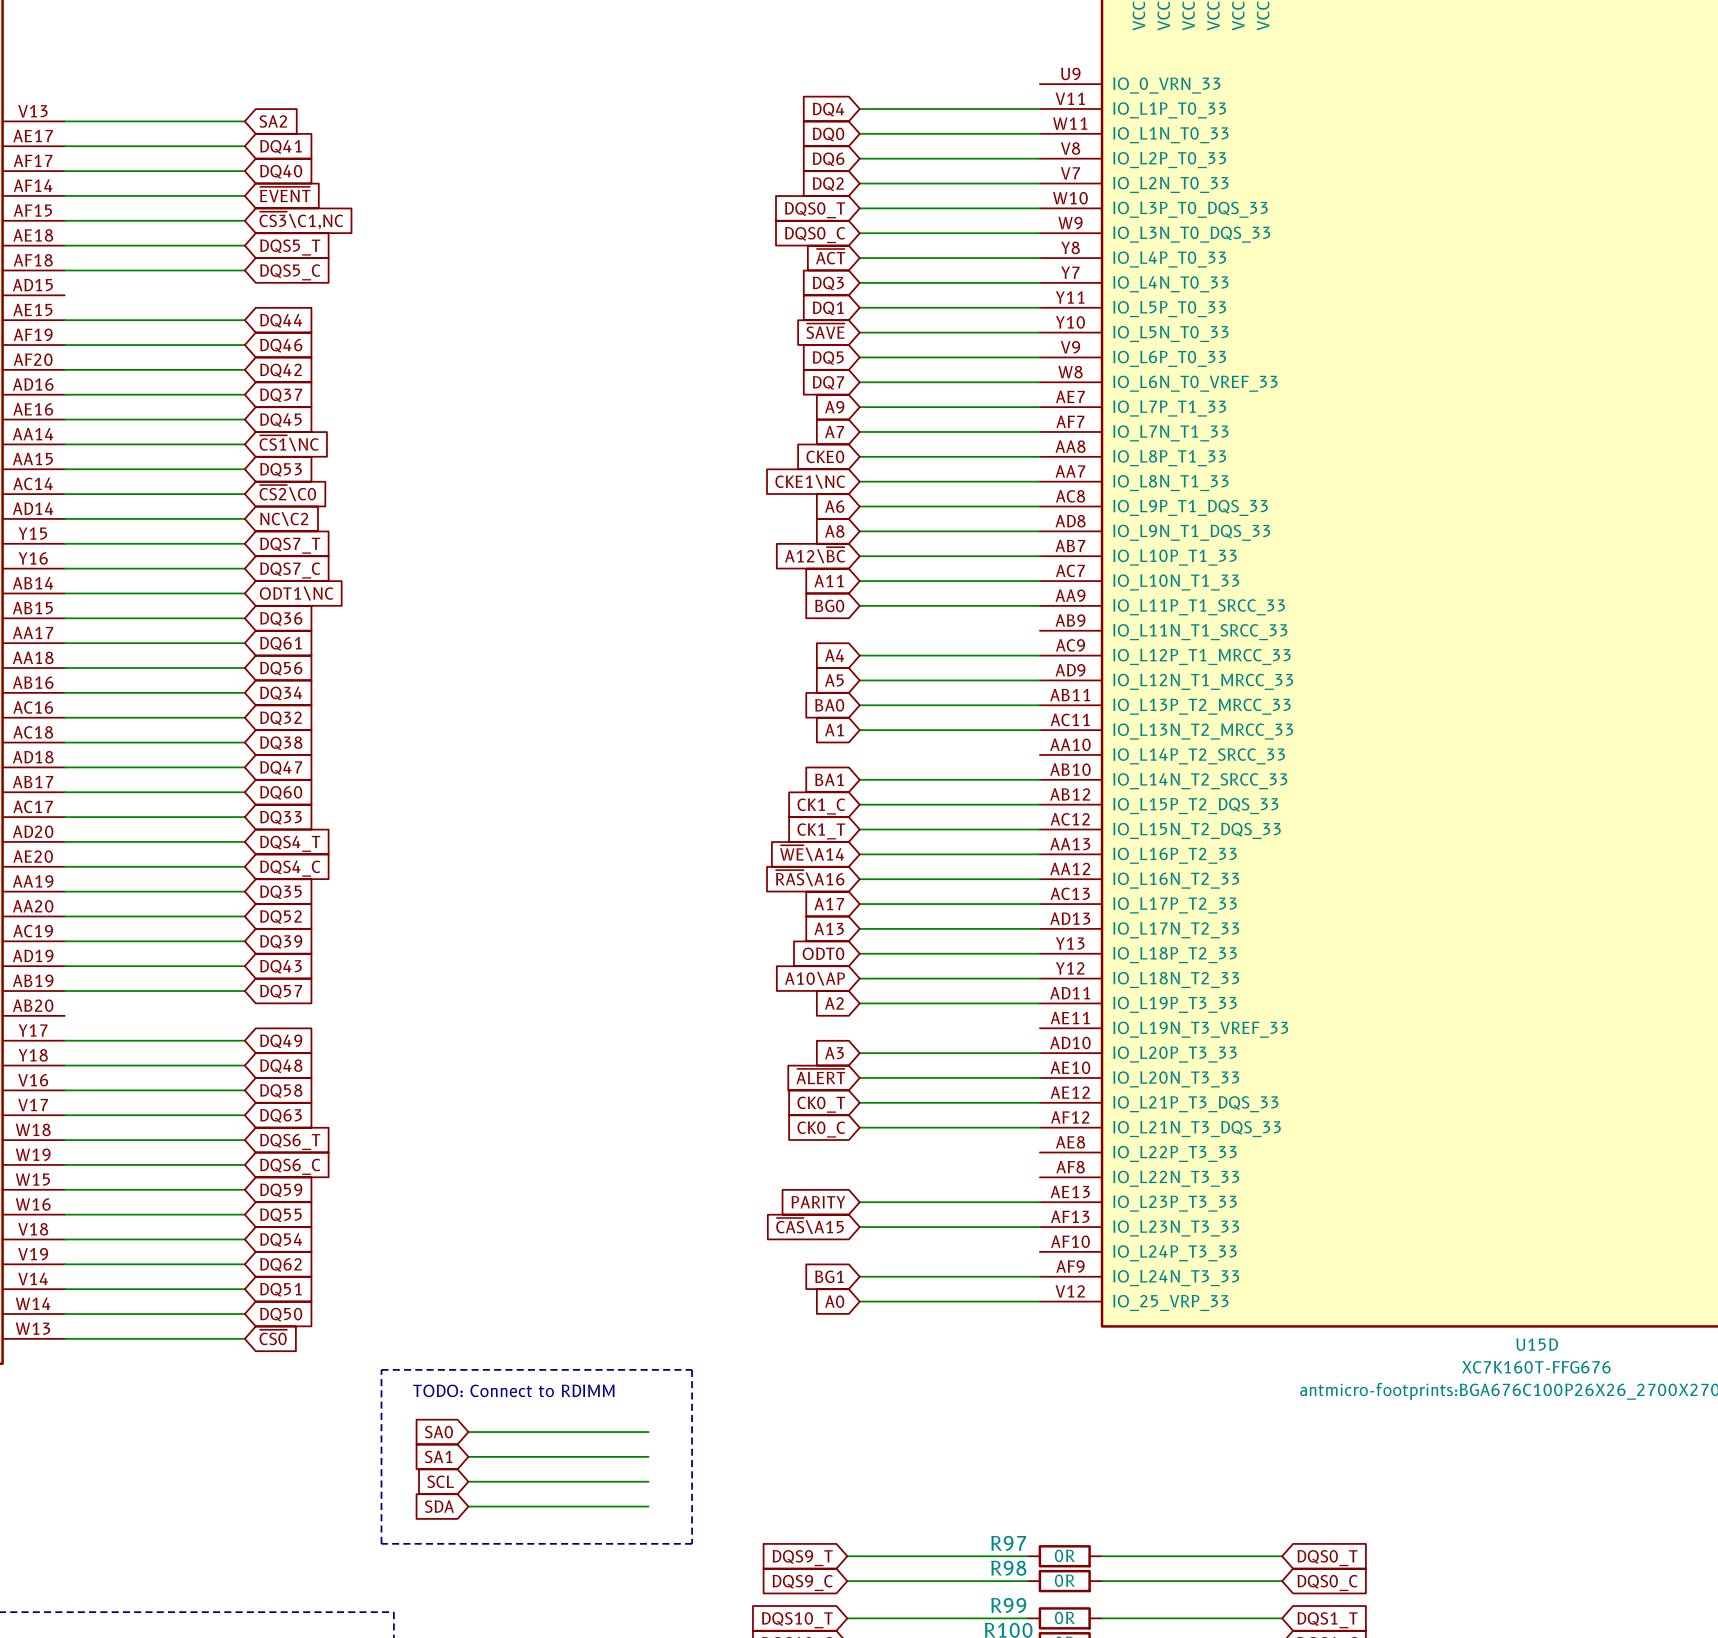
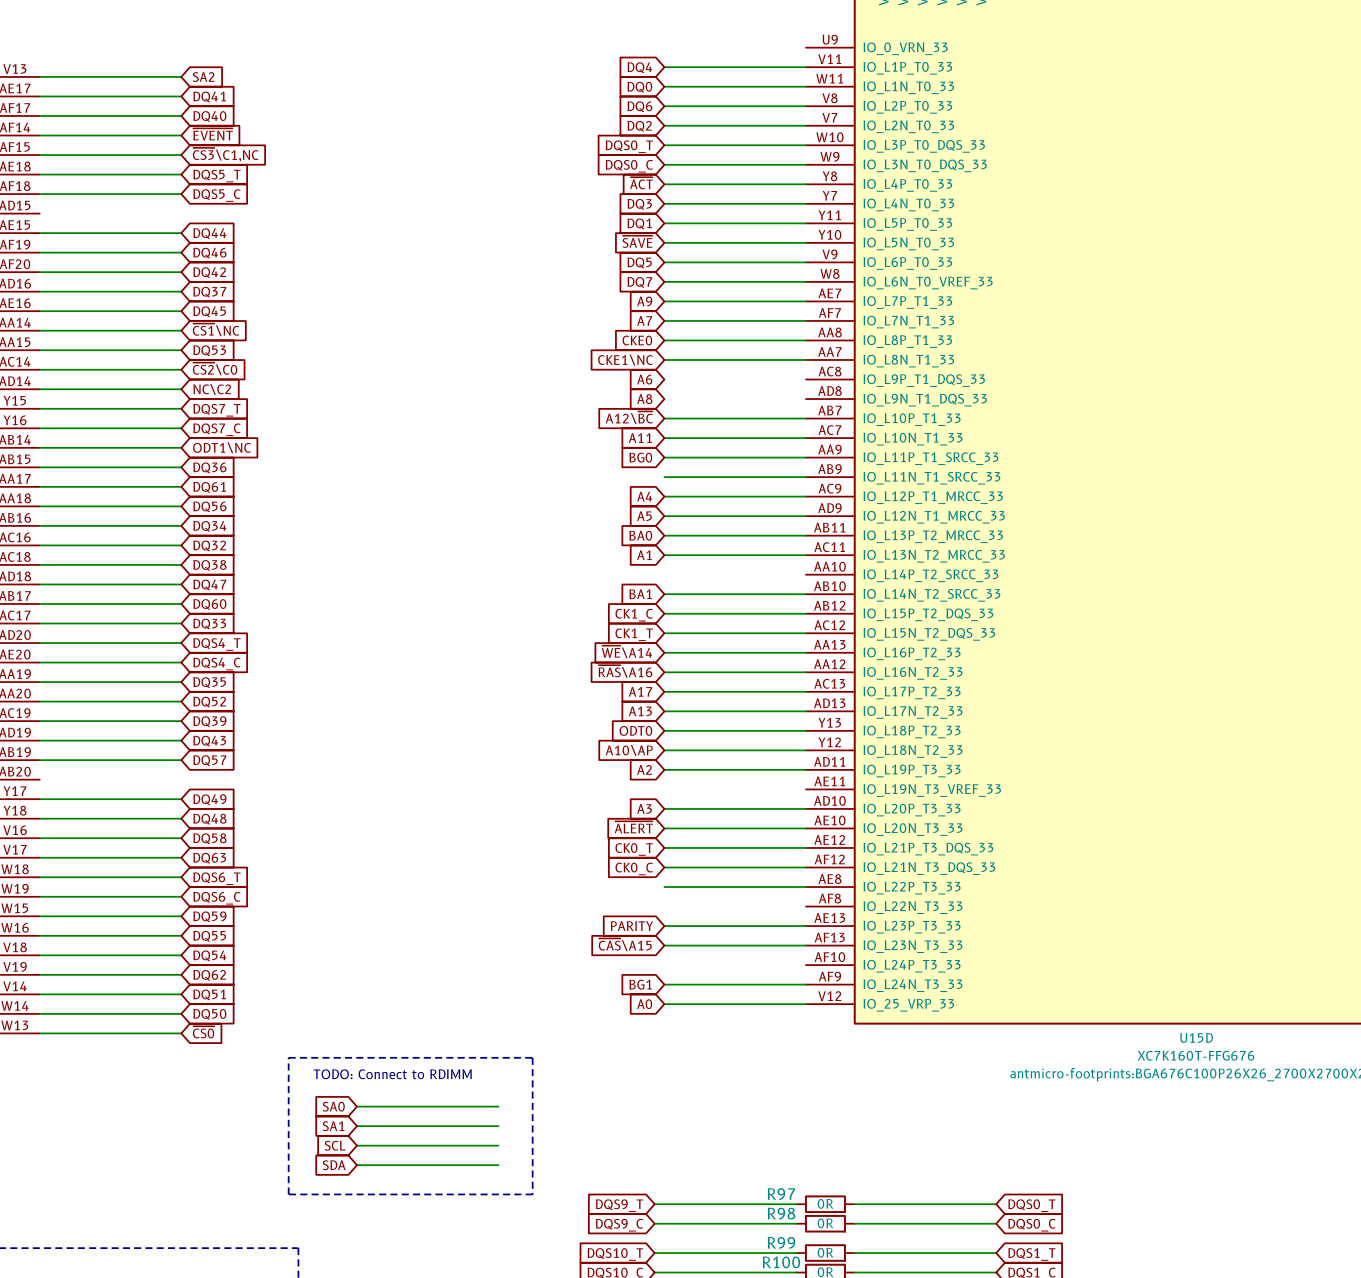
wire: (859, 506) (1039, 506) -> none
wire: (859, 531) (1039, 531) -> (664, 477) (805, 477)
wire: none -> (664, 887) (805, 887)

